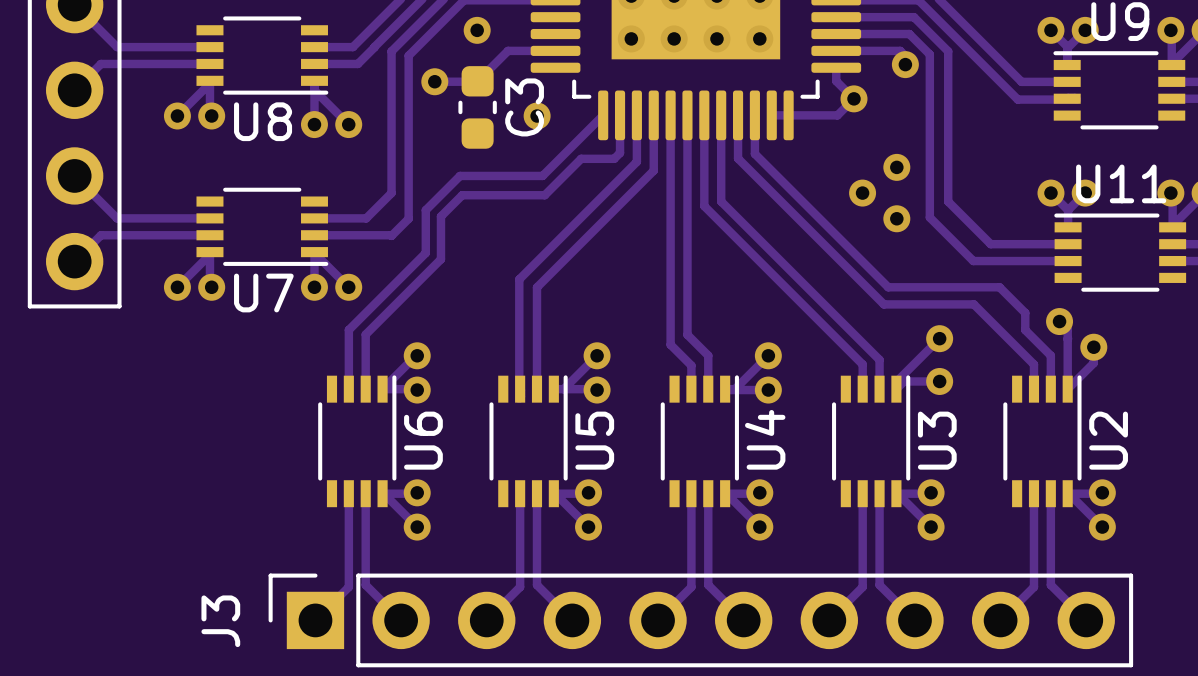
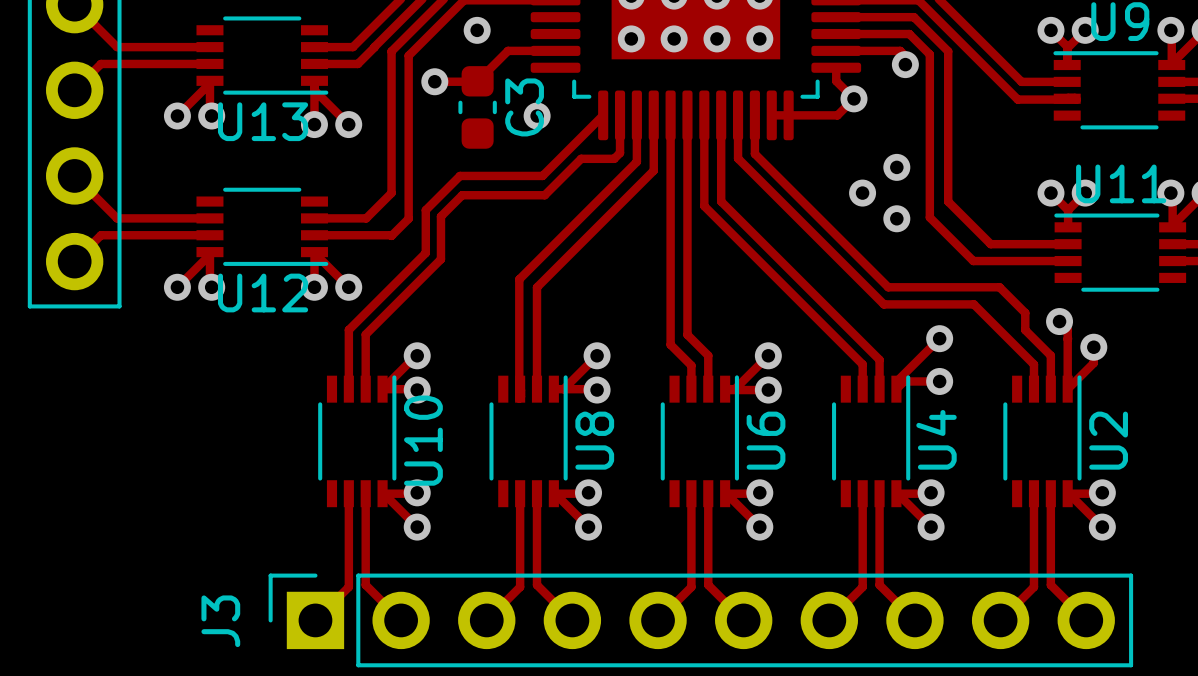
U8 name: U8 (263, 121) -> U13 (263, 121)
U7 name: U7 (263, 293) -> U12 (263, 293)
U4 name: U4 (765, 439) -> U6 (766, 440)
U6 name: U6 (423, 440) -> U10 (423, 440)
U5 name: U5 (594, 440) -> U8 (594, 440)
U3 name: U3 (937, 440) -> U4 (936, 439)

